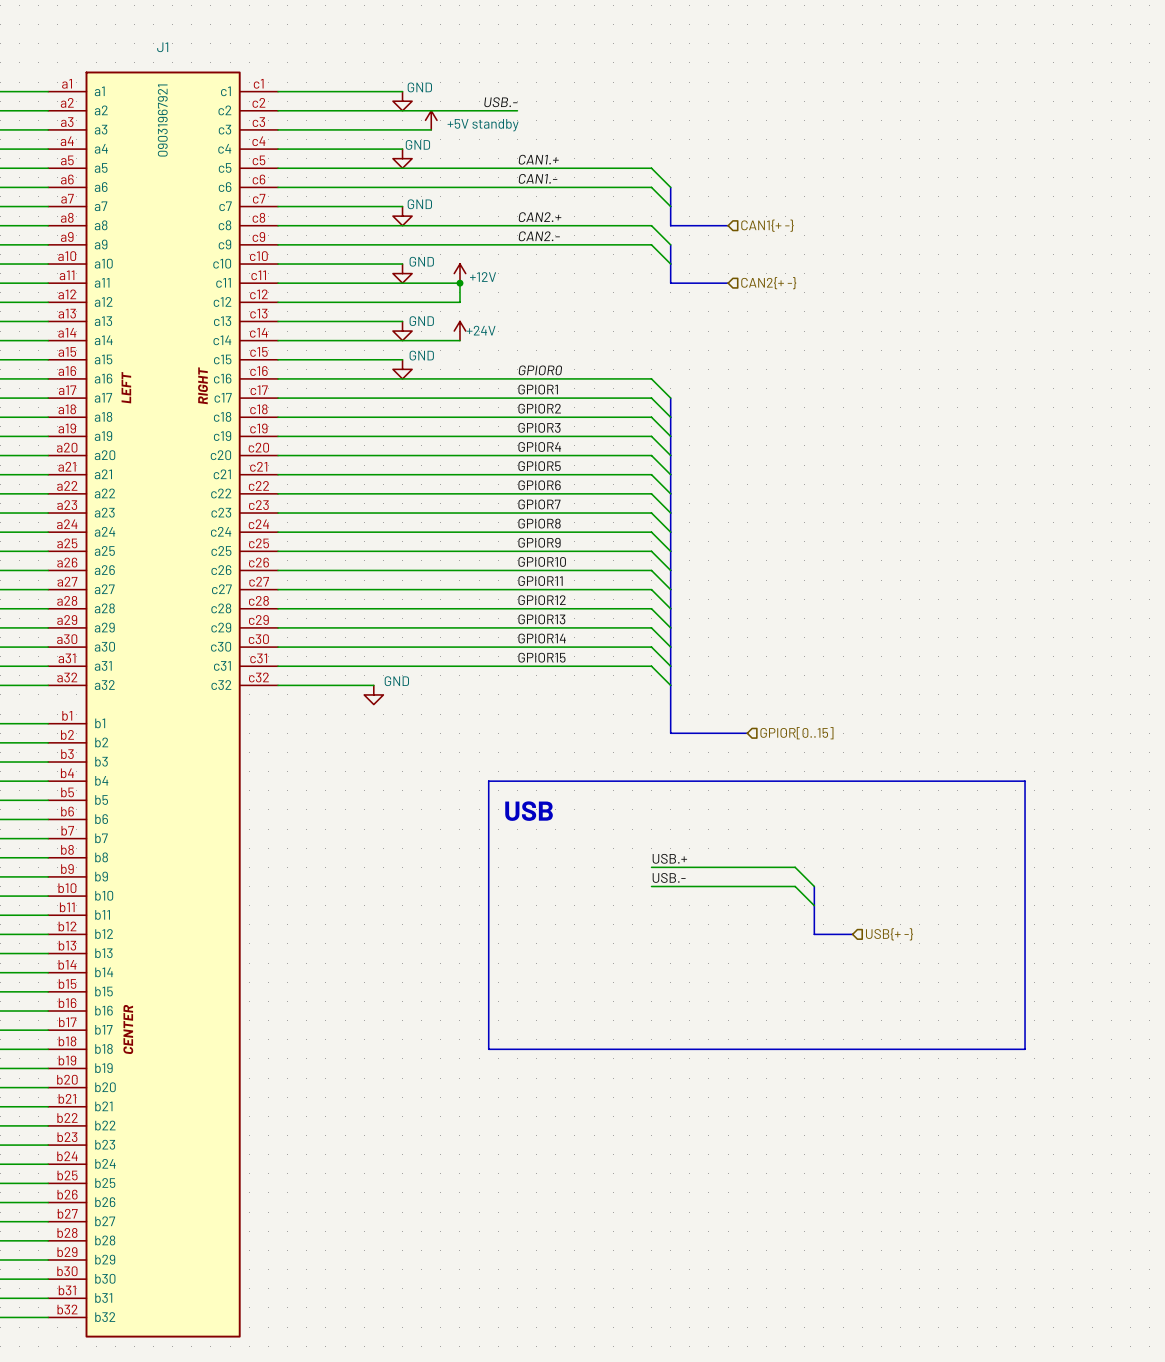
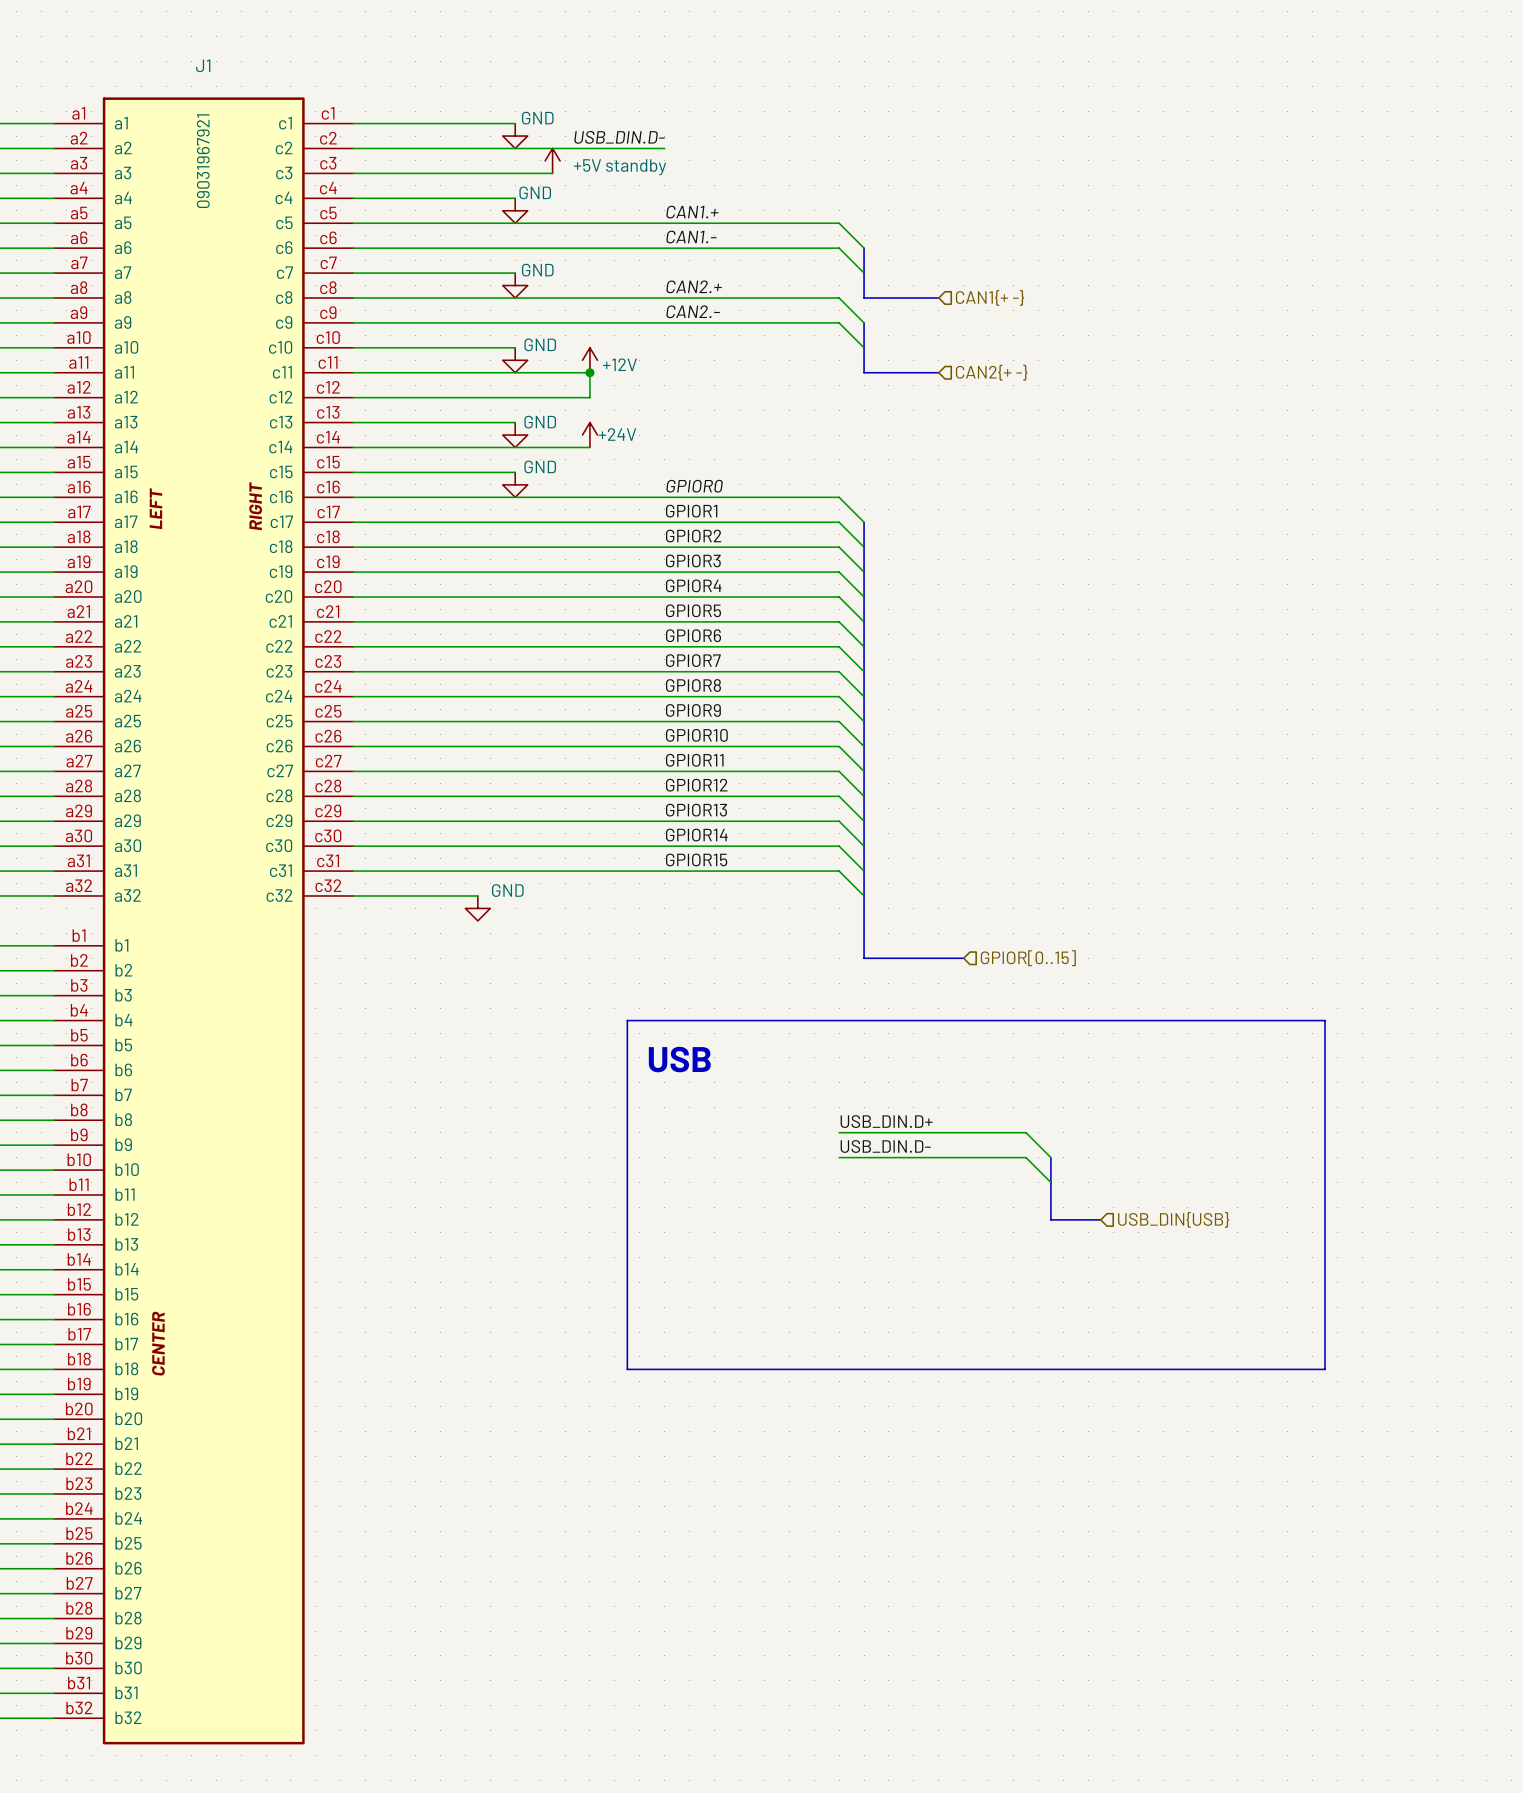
label: USB.- (500, 102) -> USB_DIN.D- (619, 137)
label: USB.+ (669, 858) -> USB_DIN.D+ (886, 1121)
label: USB.- (669, 877) -> USB_DIN.D- (885, 1146)
hierarchical label: USB{+ -} (889, 934) -> USB_DIN{USB} (1173, 1219)

